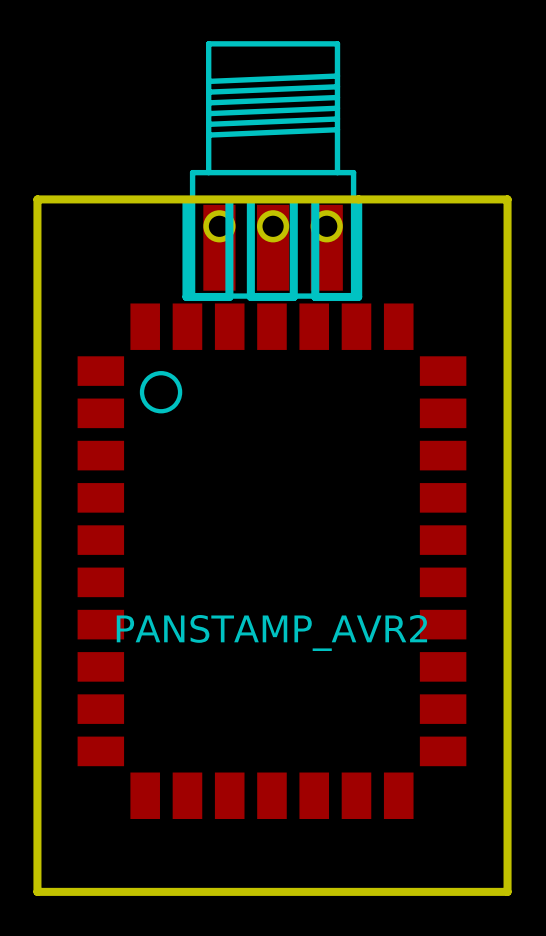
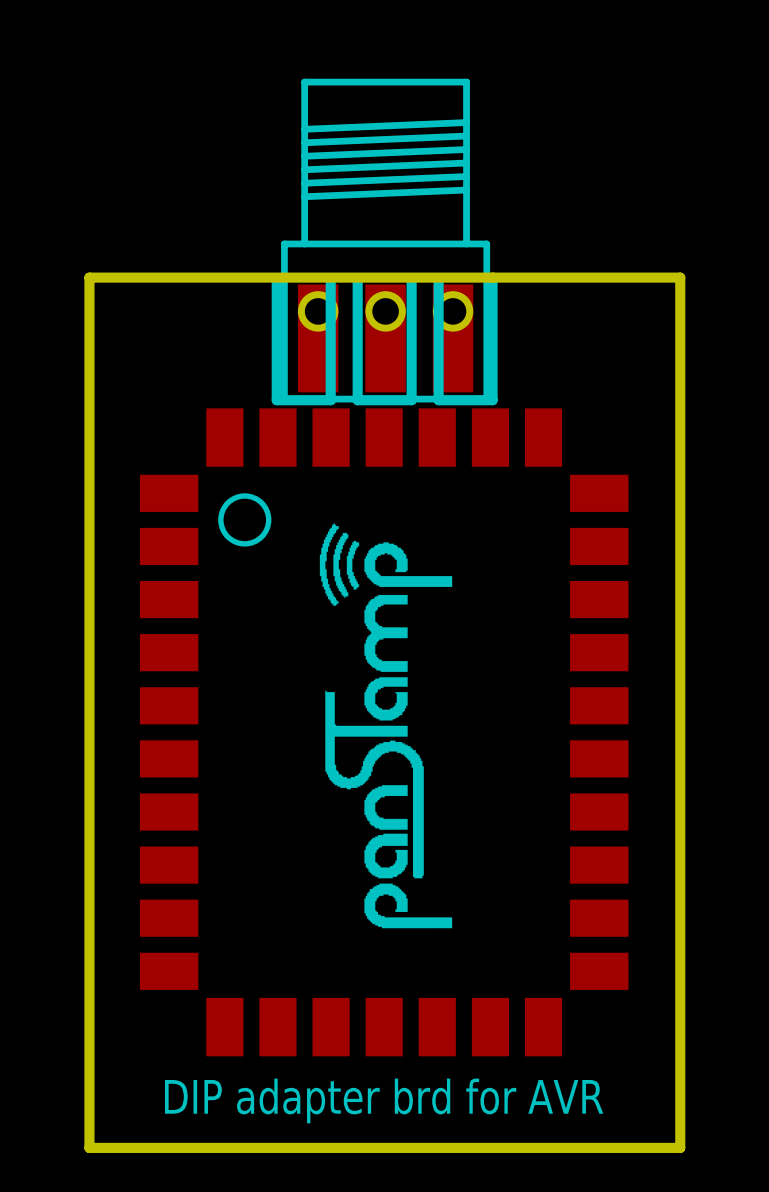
drawing: none -> [319, 523, 453, 929]
part value: PANSTAMP_AVR2 (271, 633) -> none
text: none -> DIP adapter brd for AVR (384, 1100)

